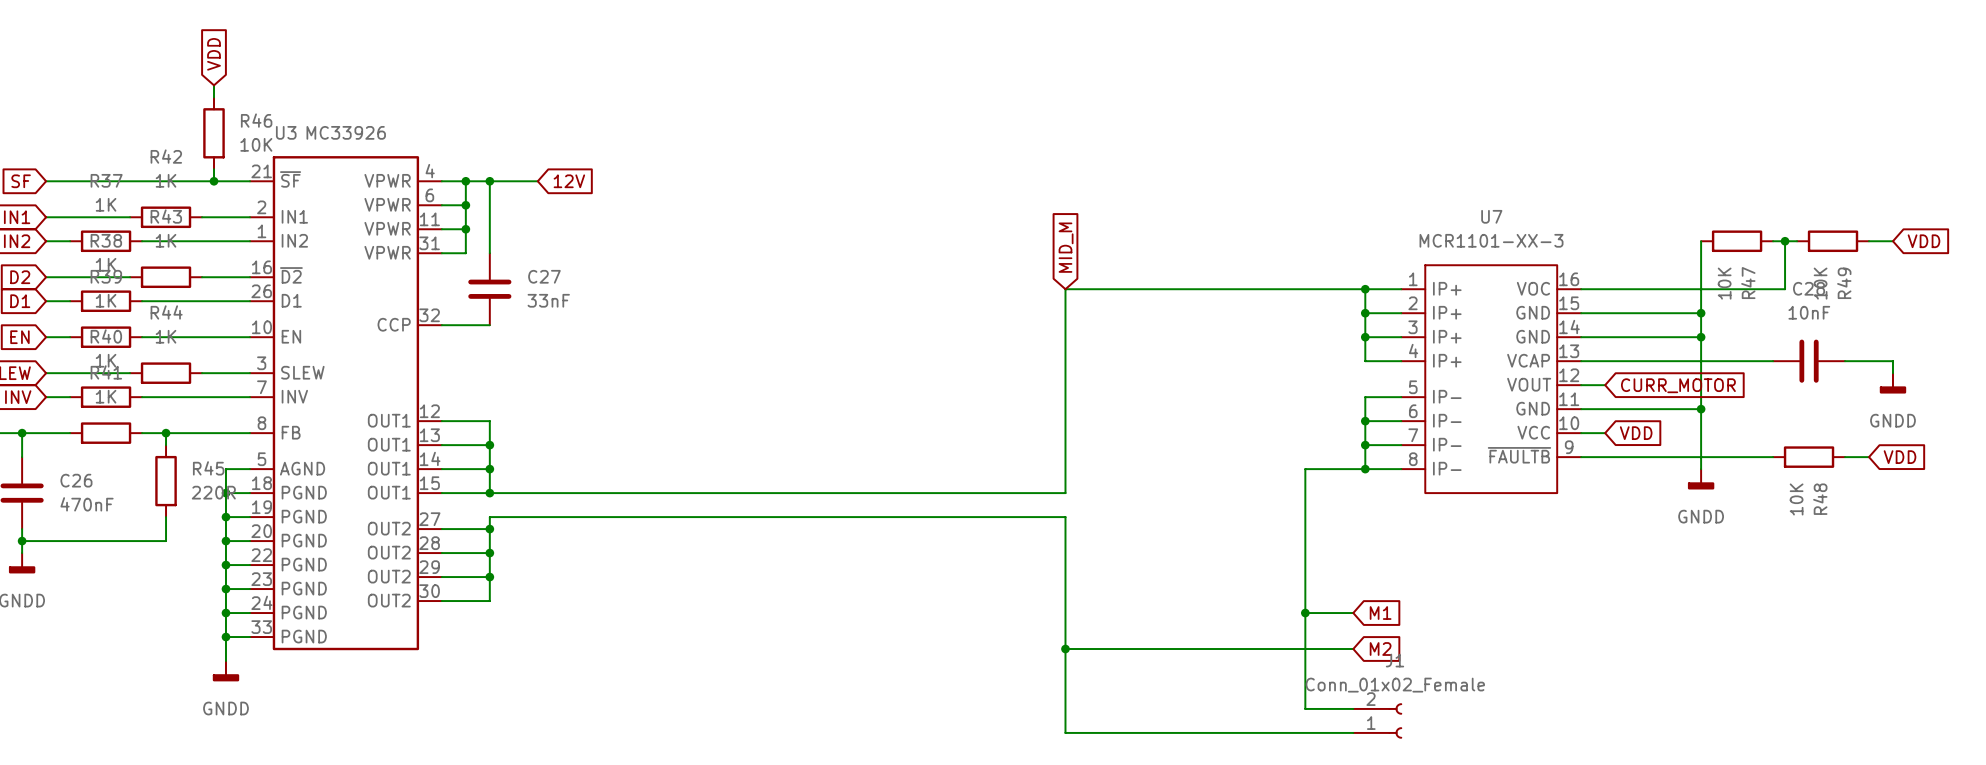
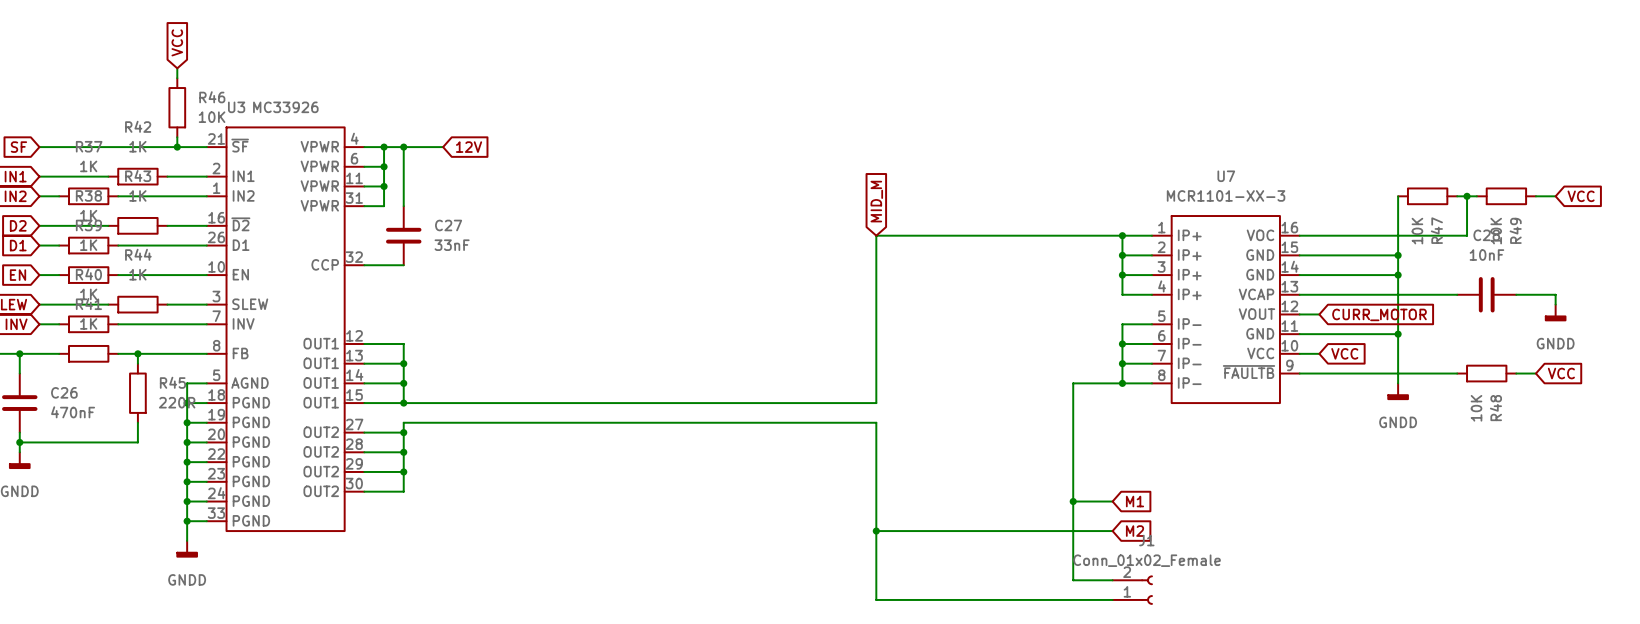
global label: VDD (214, 54) -> VCC (177, 42)
global label: VDD (1923, 241) -> VCC (1581, 196)
global label: VDD (1636, 433) -> VCC (1344, 353)
global label: VDD (1900, 457) -> VCC (1561, 373)

